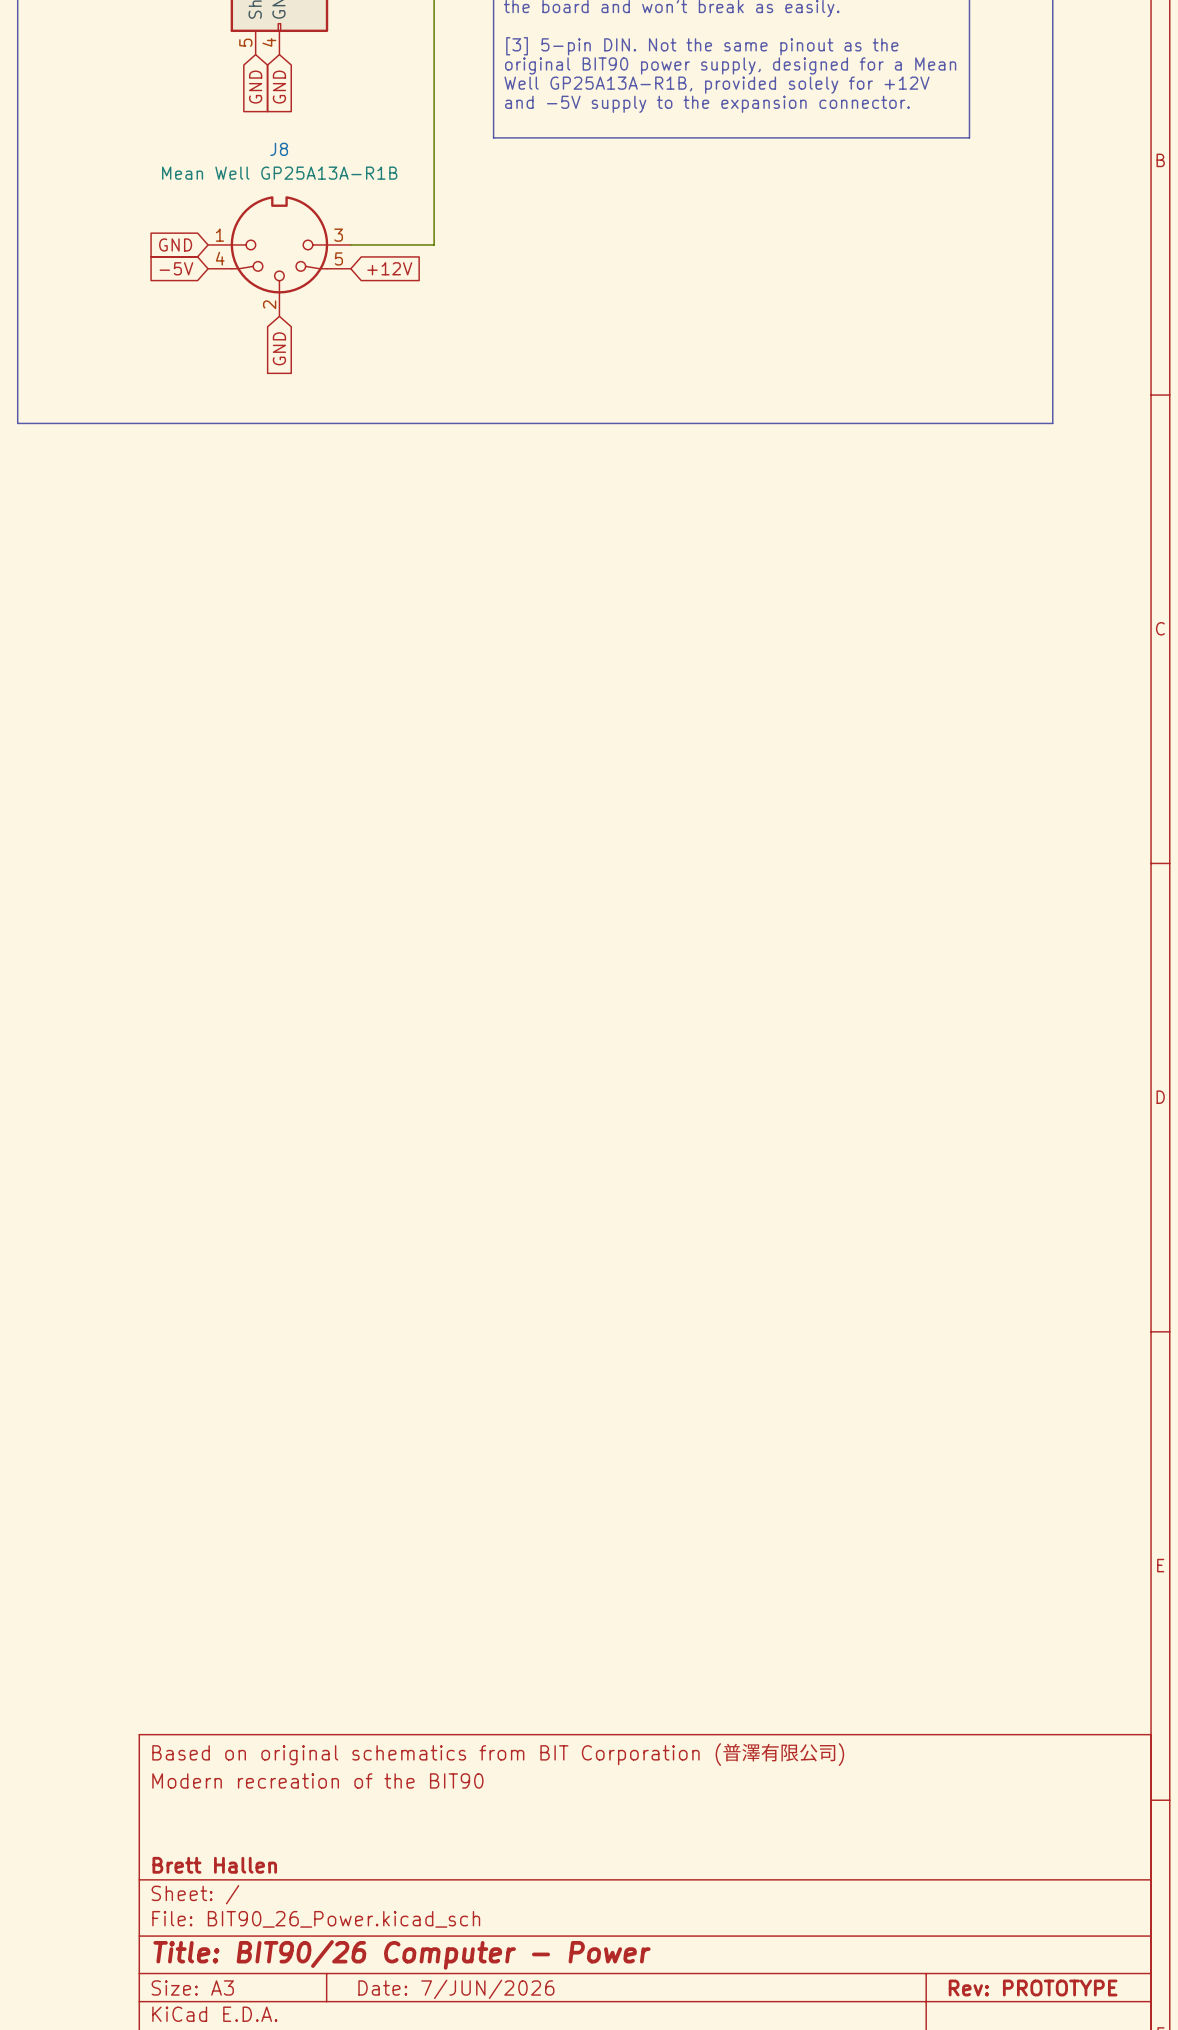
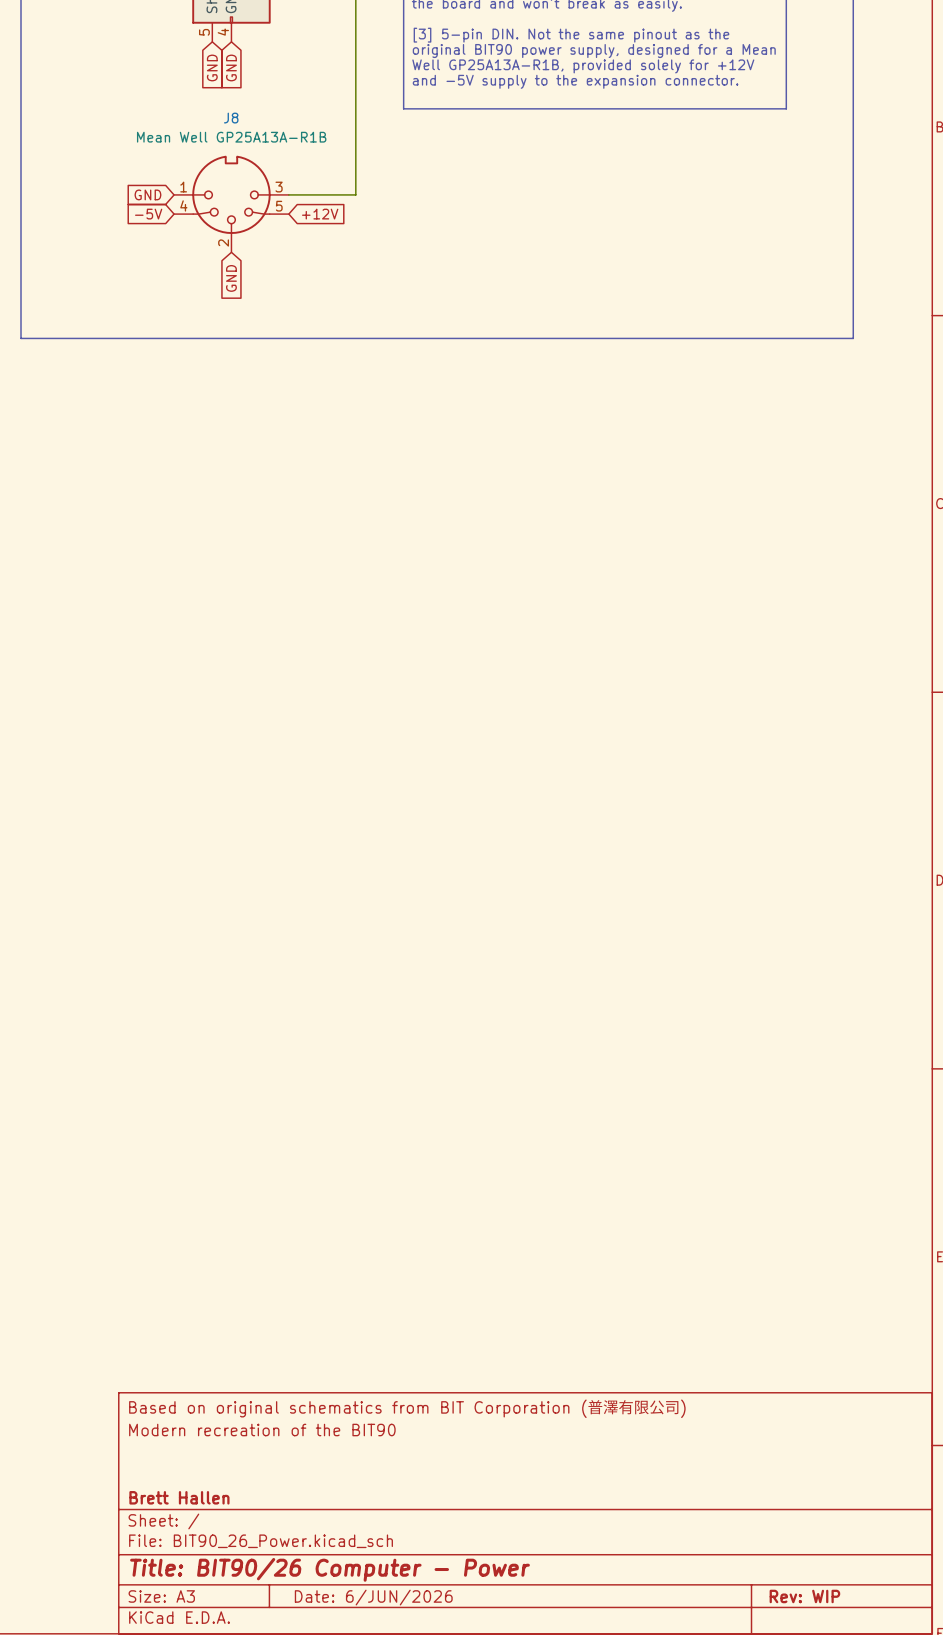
title block: Rev: PROTOTYPE (1033, 1988) -> Rev: WIP (804, 1596)
title block: Date: 7/JUN/2026 (456, 1989) -> Date: 6/JUN/2026 (373, 1597)

